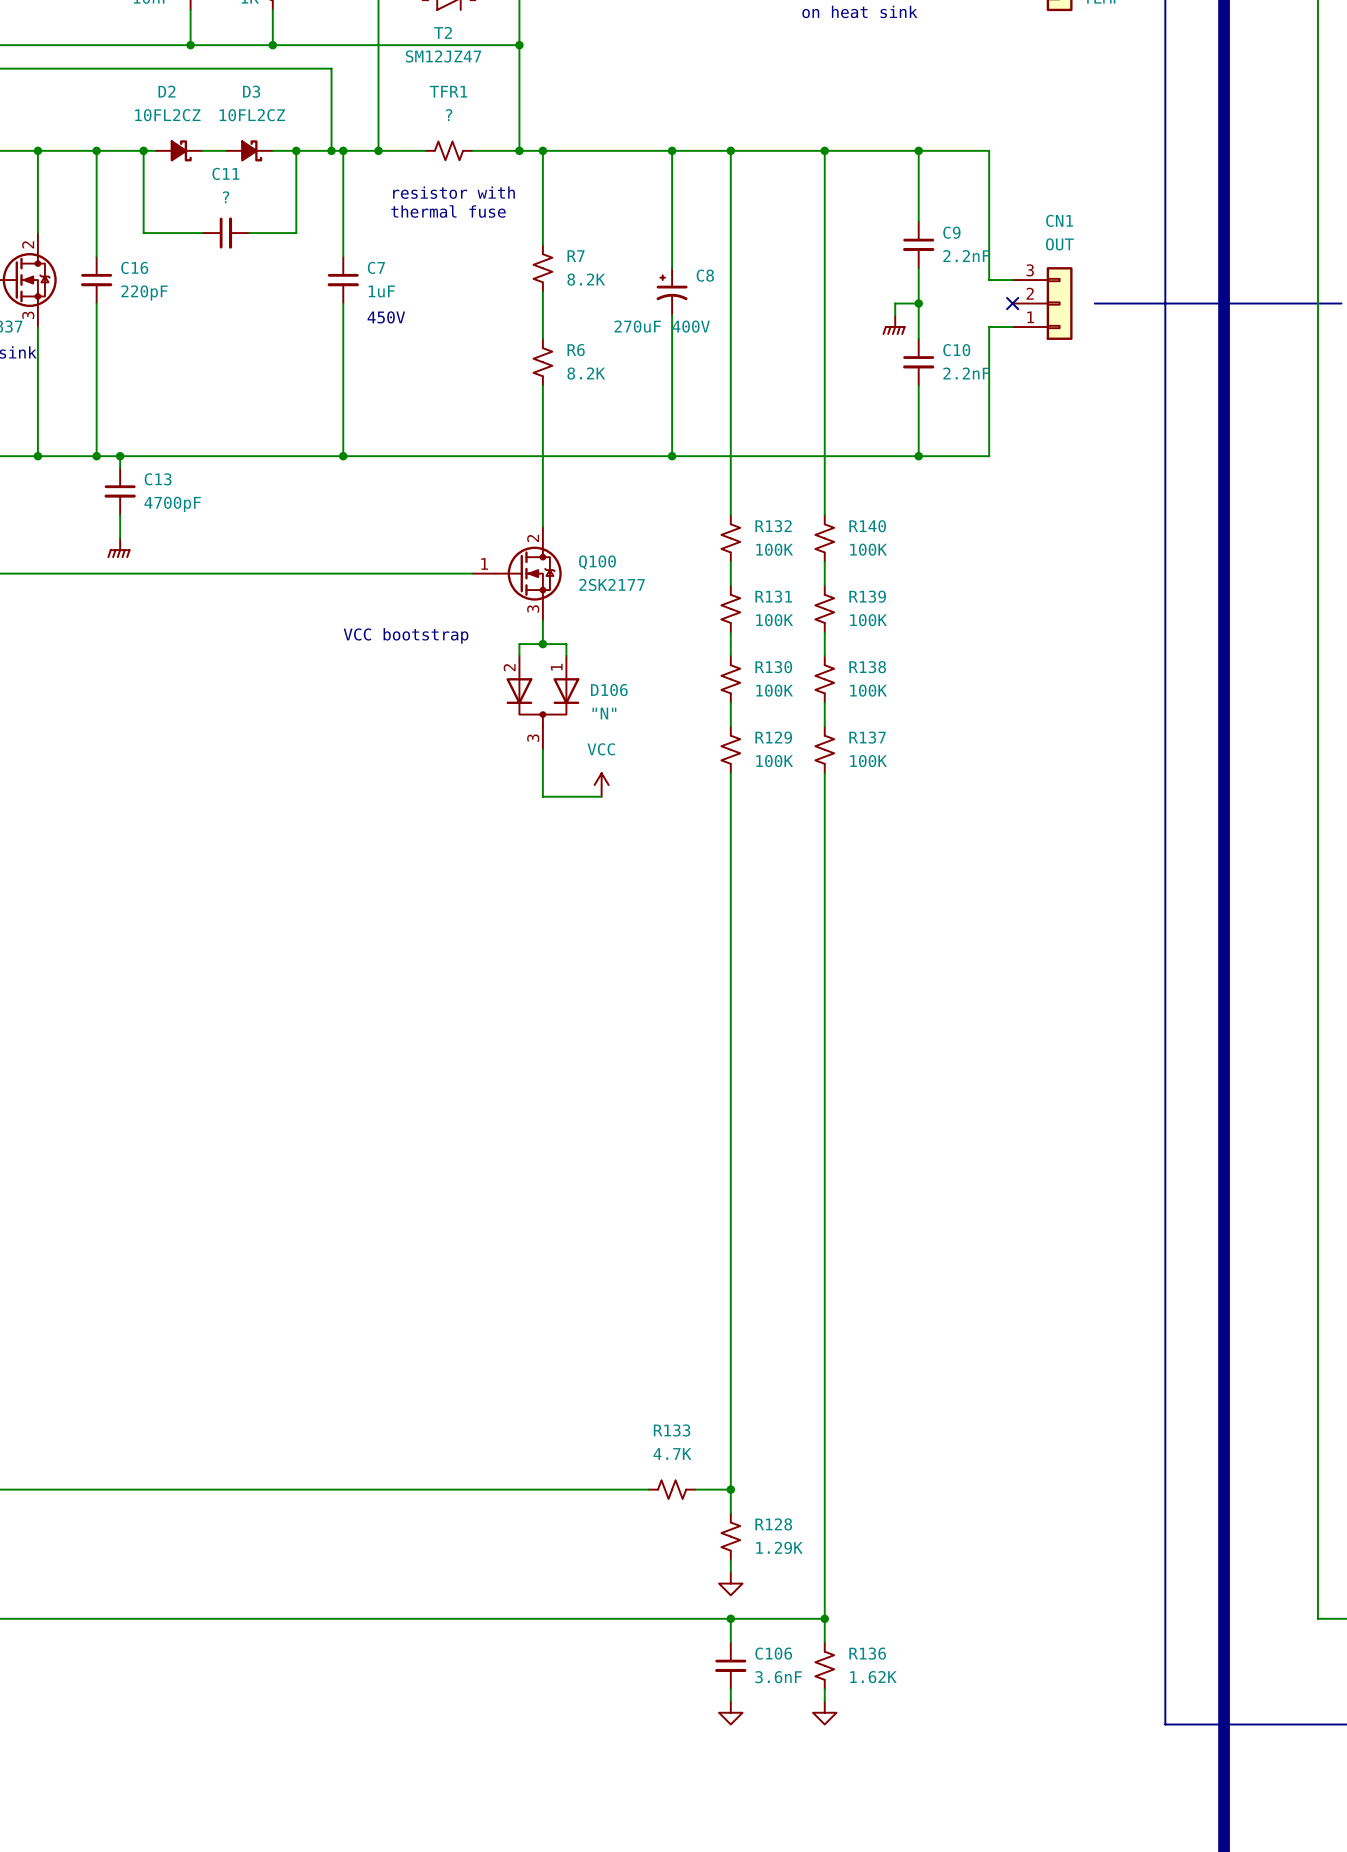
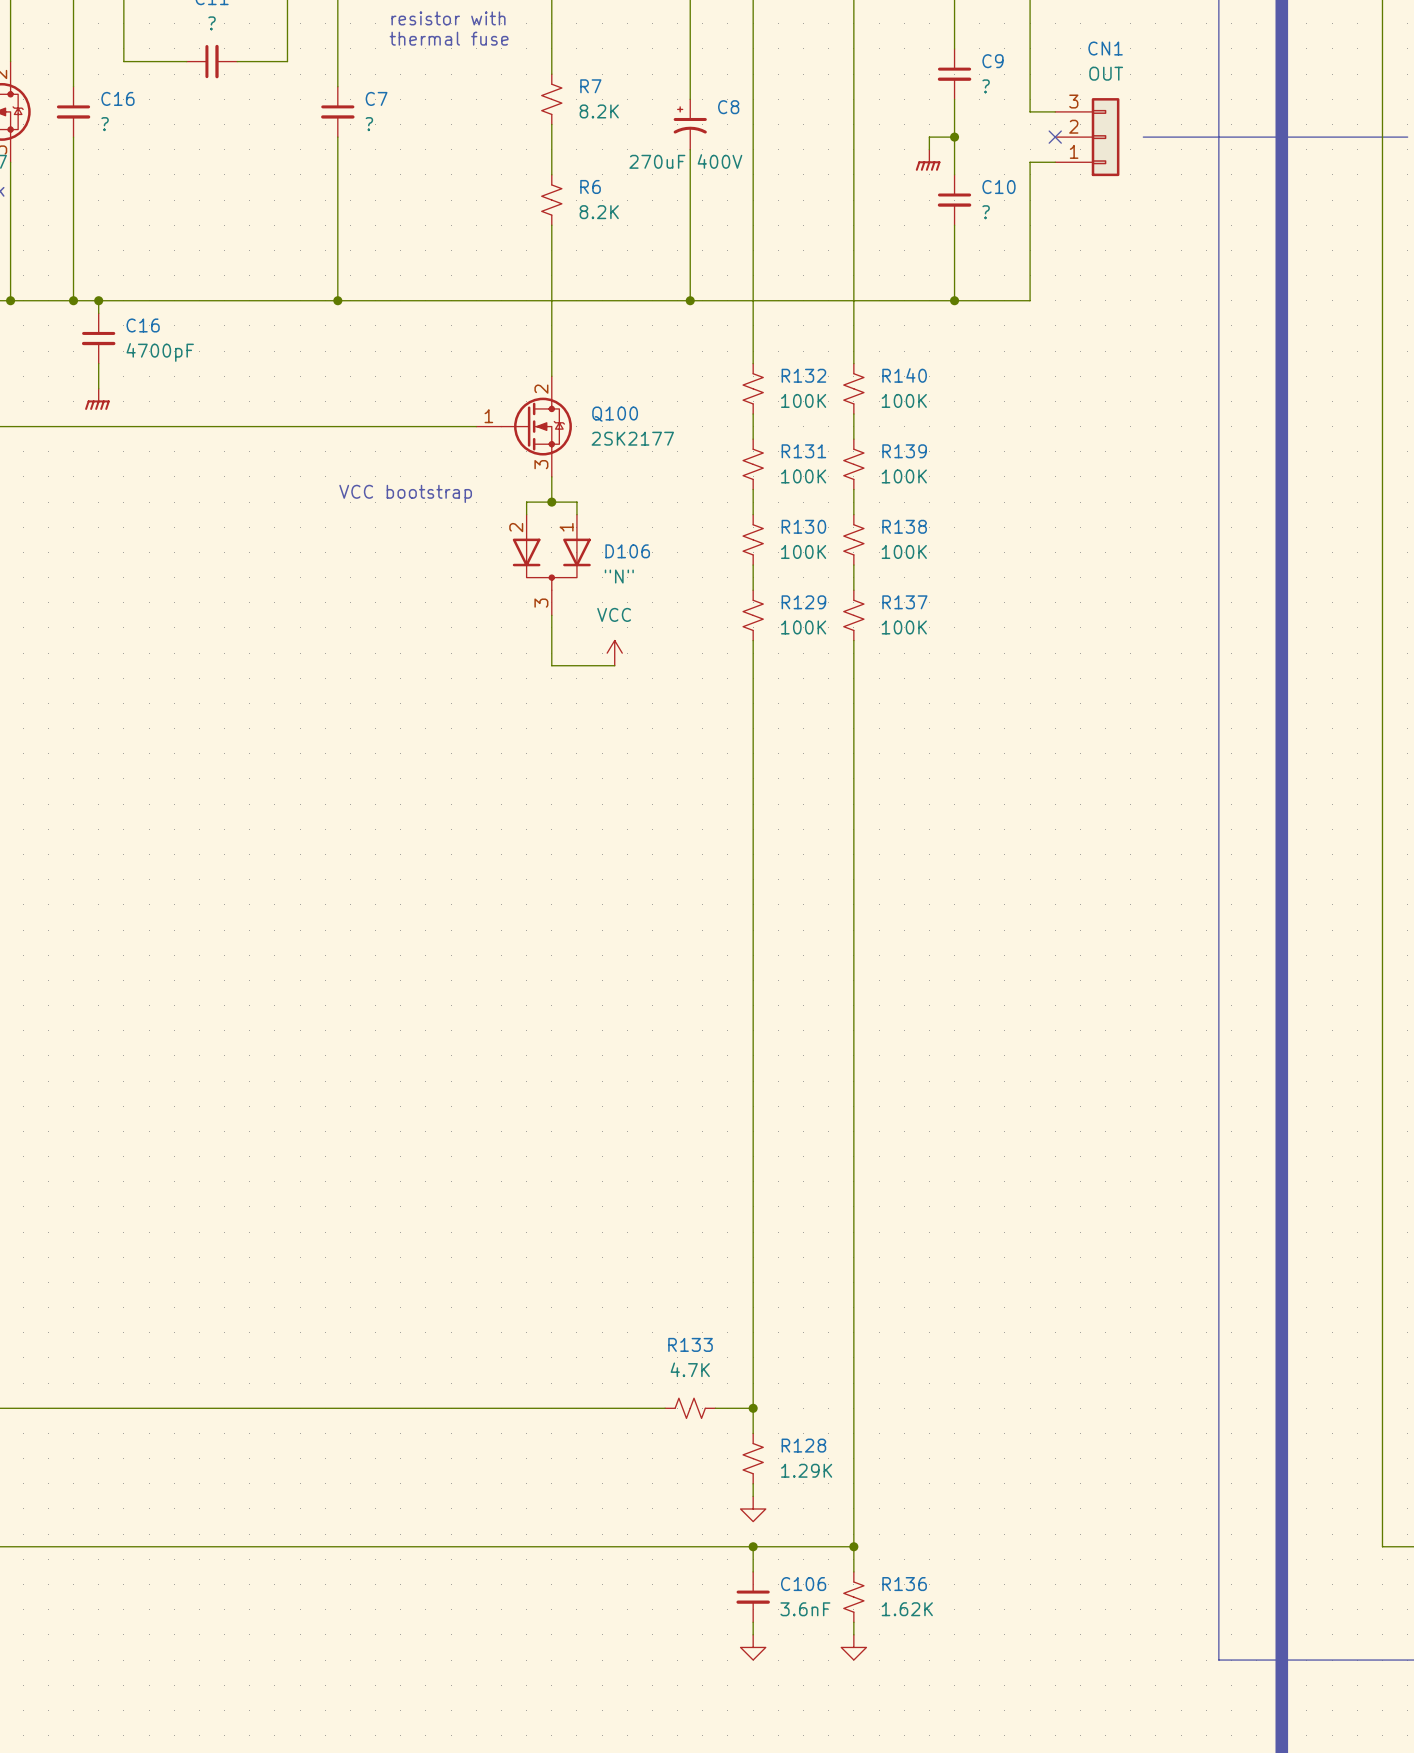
C9 value: 2.2nF (966, 256) -> ? (986, 86)
C7 value: 1uF (381, 291) -> ? (369, 124)
C16 value: 220pF (144, 292) -> ? (105, 124)
text: 450V (386, 317) -> none
C10 value: 2.2nF (966, 373) -> ? (986, 212)
C13 name: C13 (158, 479) -> C16 (143, 325)

